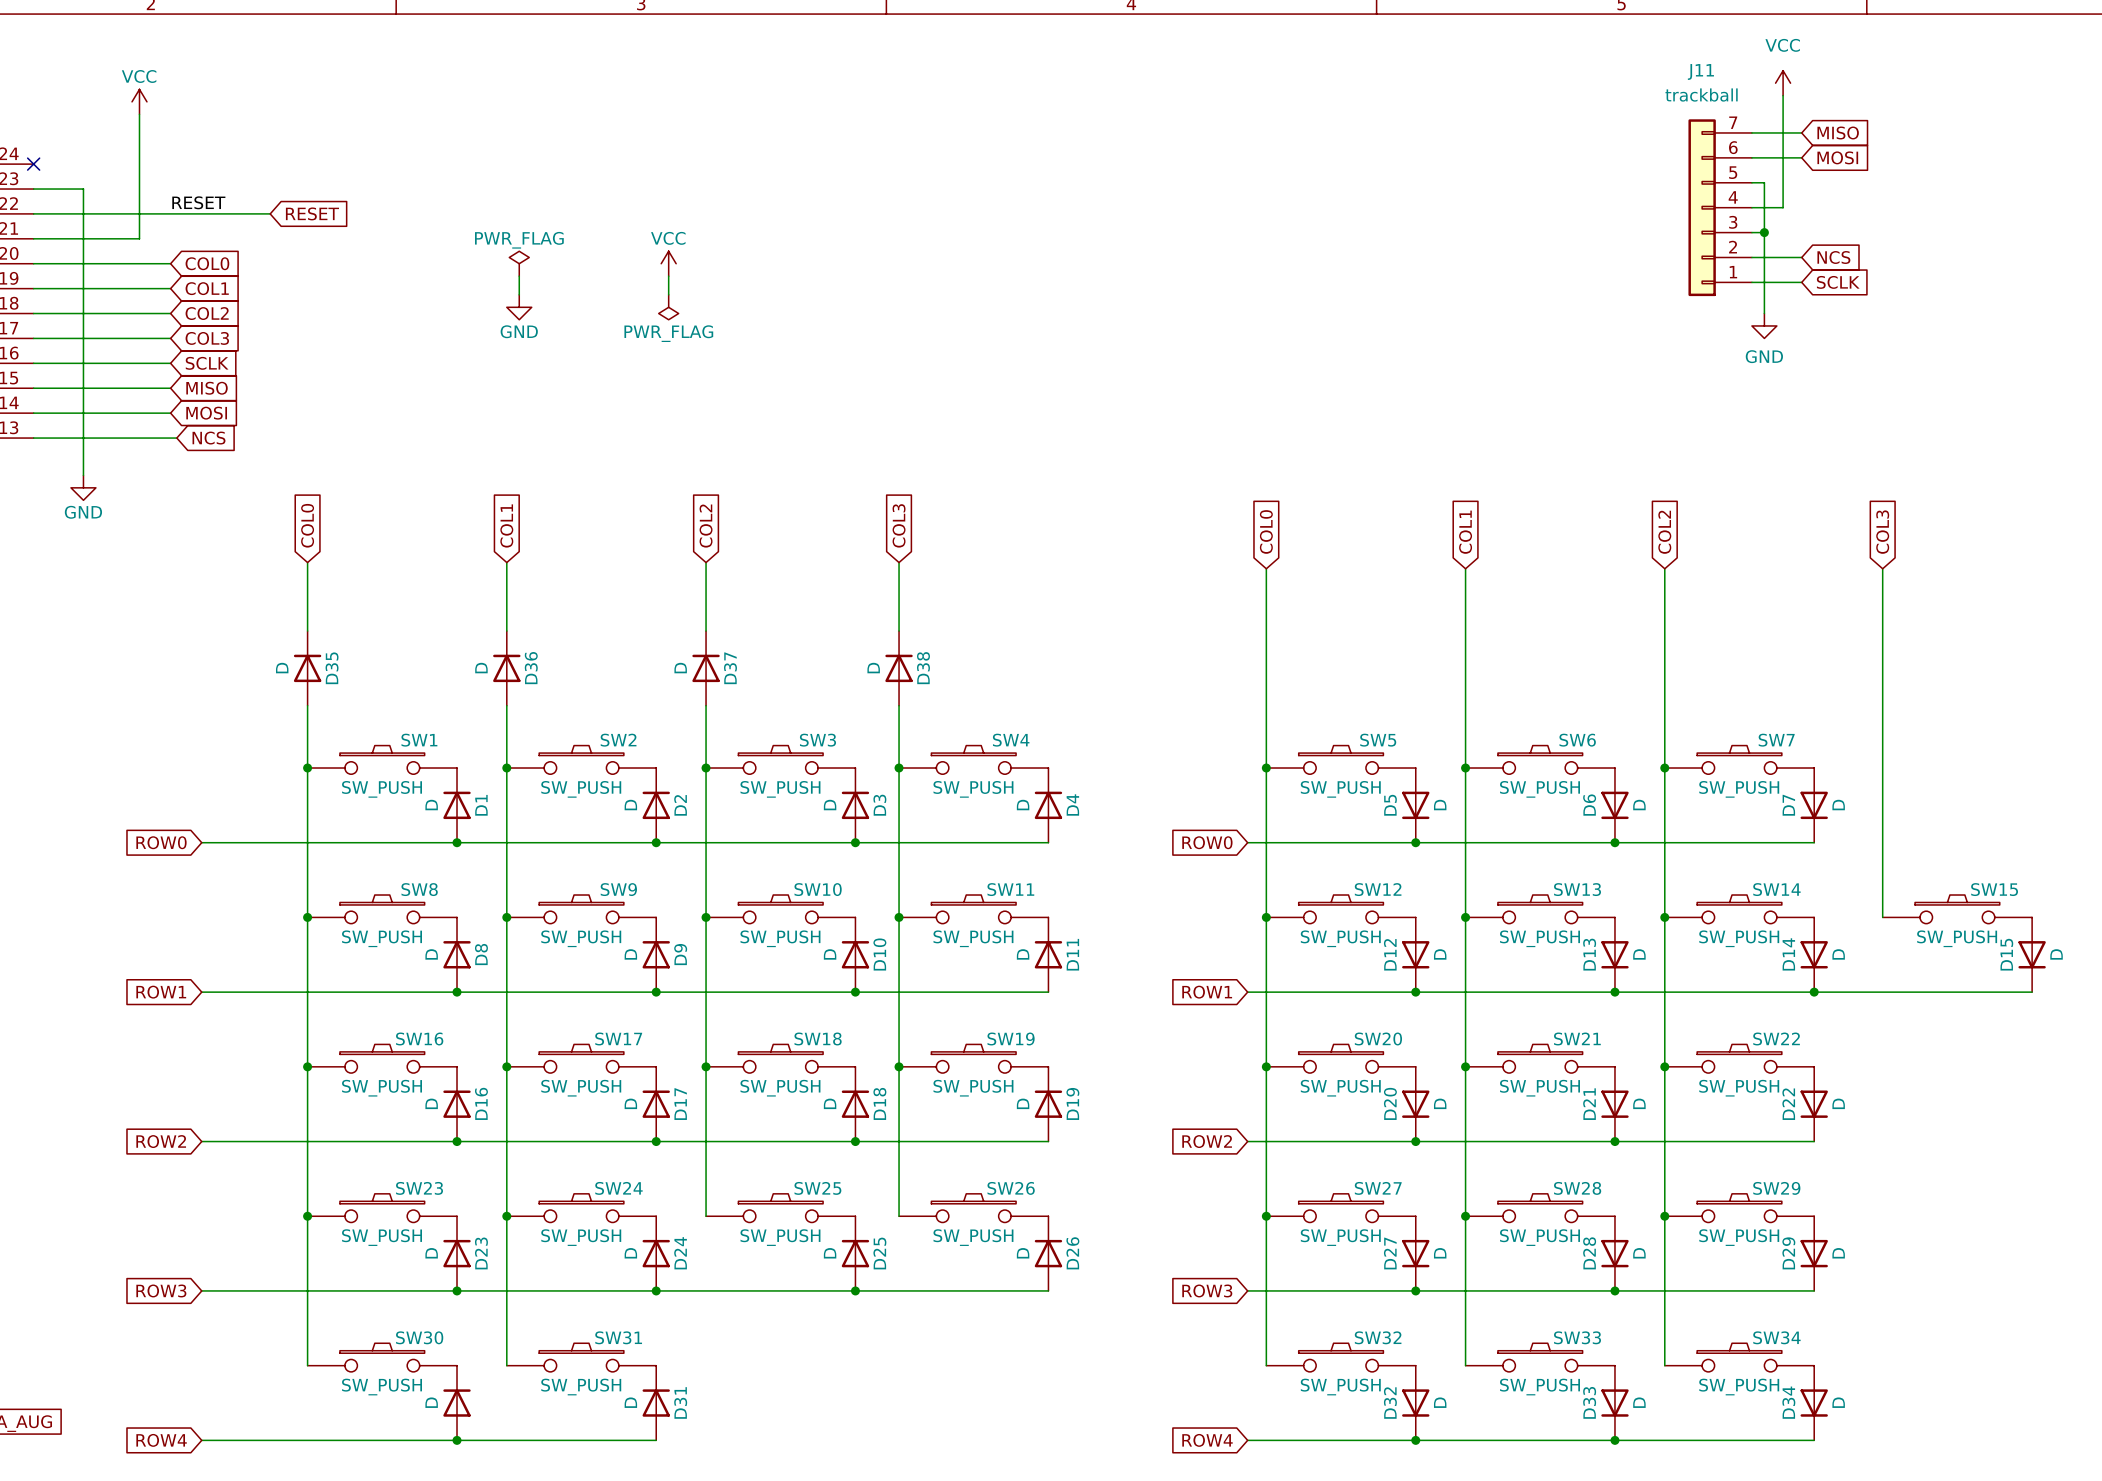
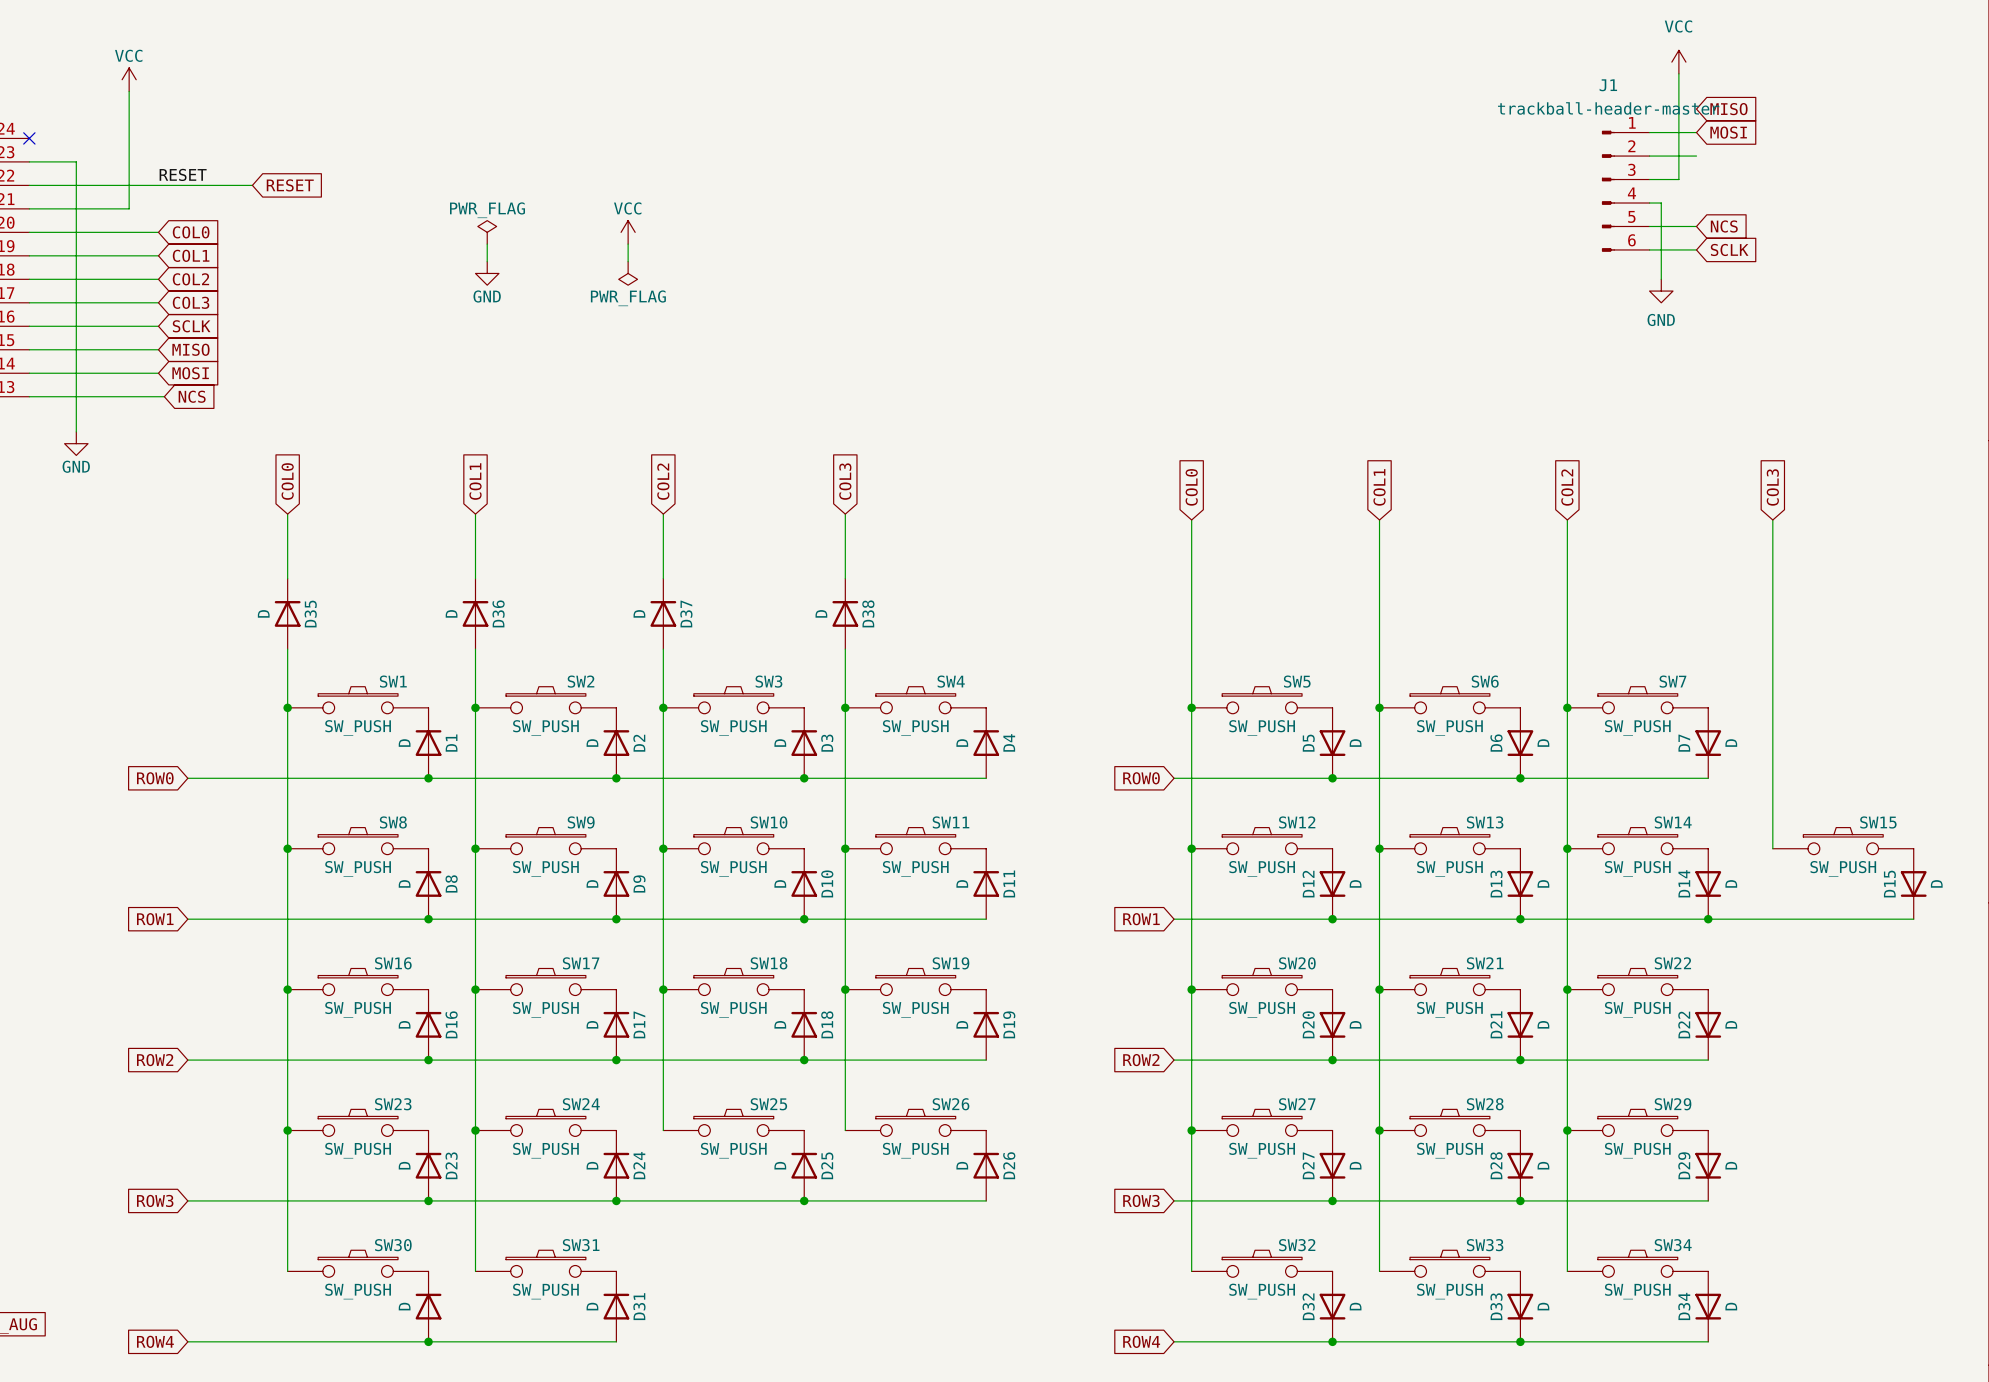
wire: (1751, 132) (1801, 132) -> none
wire: (1764, 182) (1764, 232) -> (1661, 156) (1696, 156)
J11: trackball (1720, 207) -> none
J1: none -> trackball-header-master (1625, 191)
junction: (1764, 232) -> none

